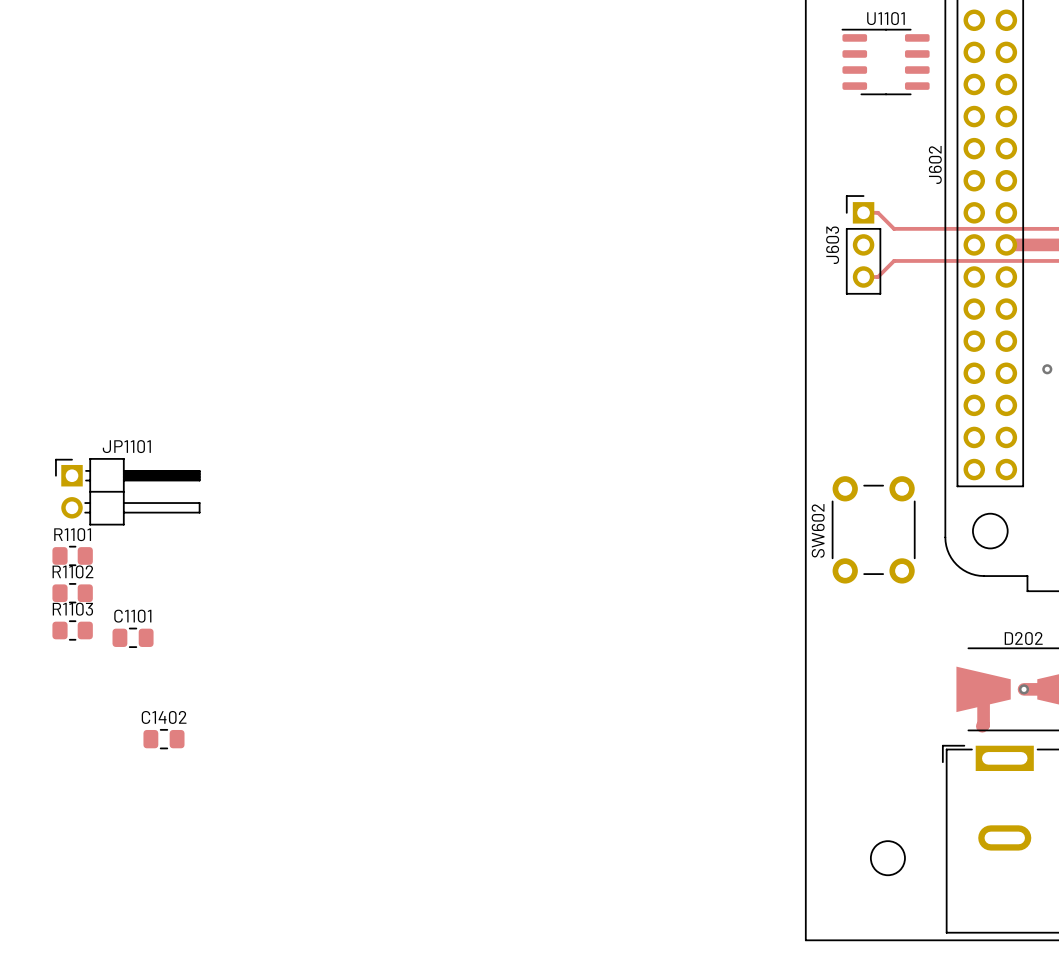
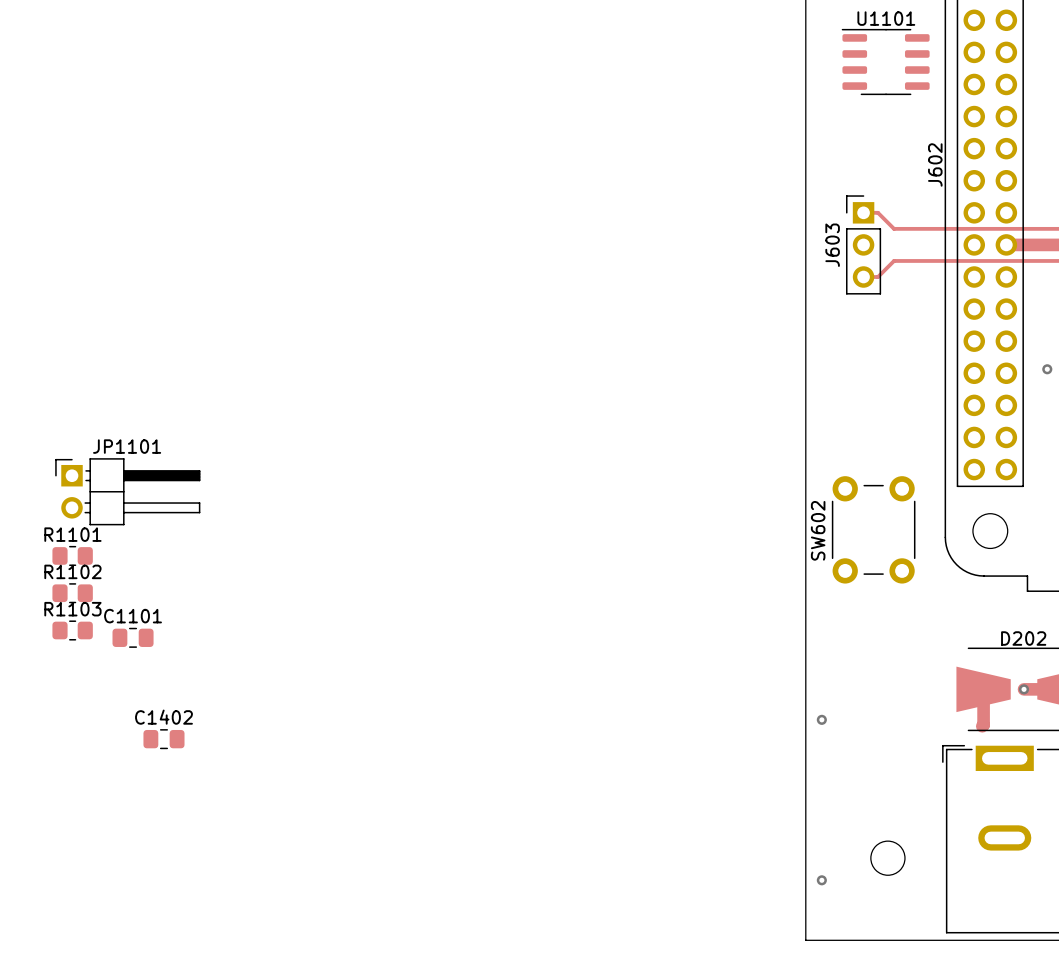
via: none -> (821, 719)
via: none -> (821, 880)

